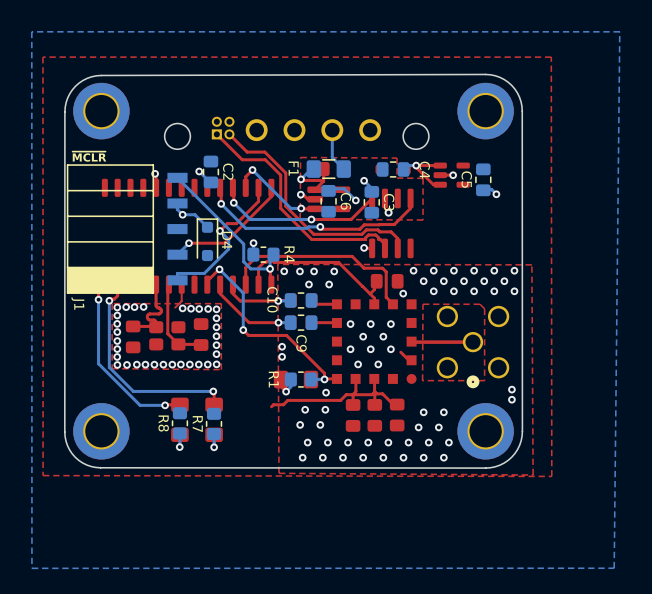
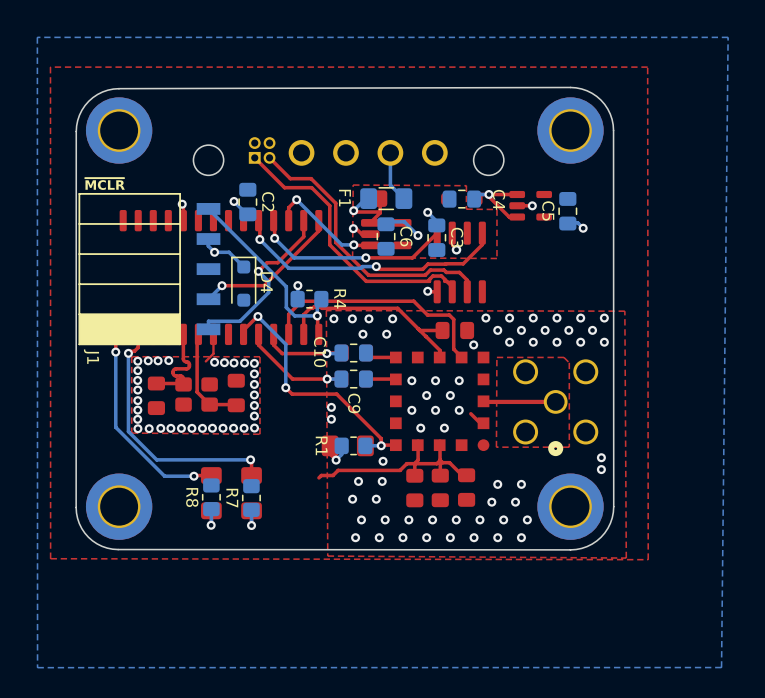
top track: (376, 281) (374, 283) (374, 289) (370, 293) -> (442, 330) (419, 330)

